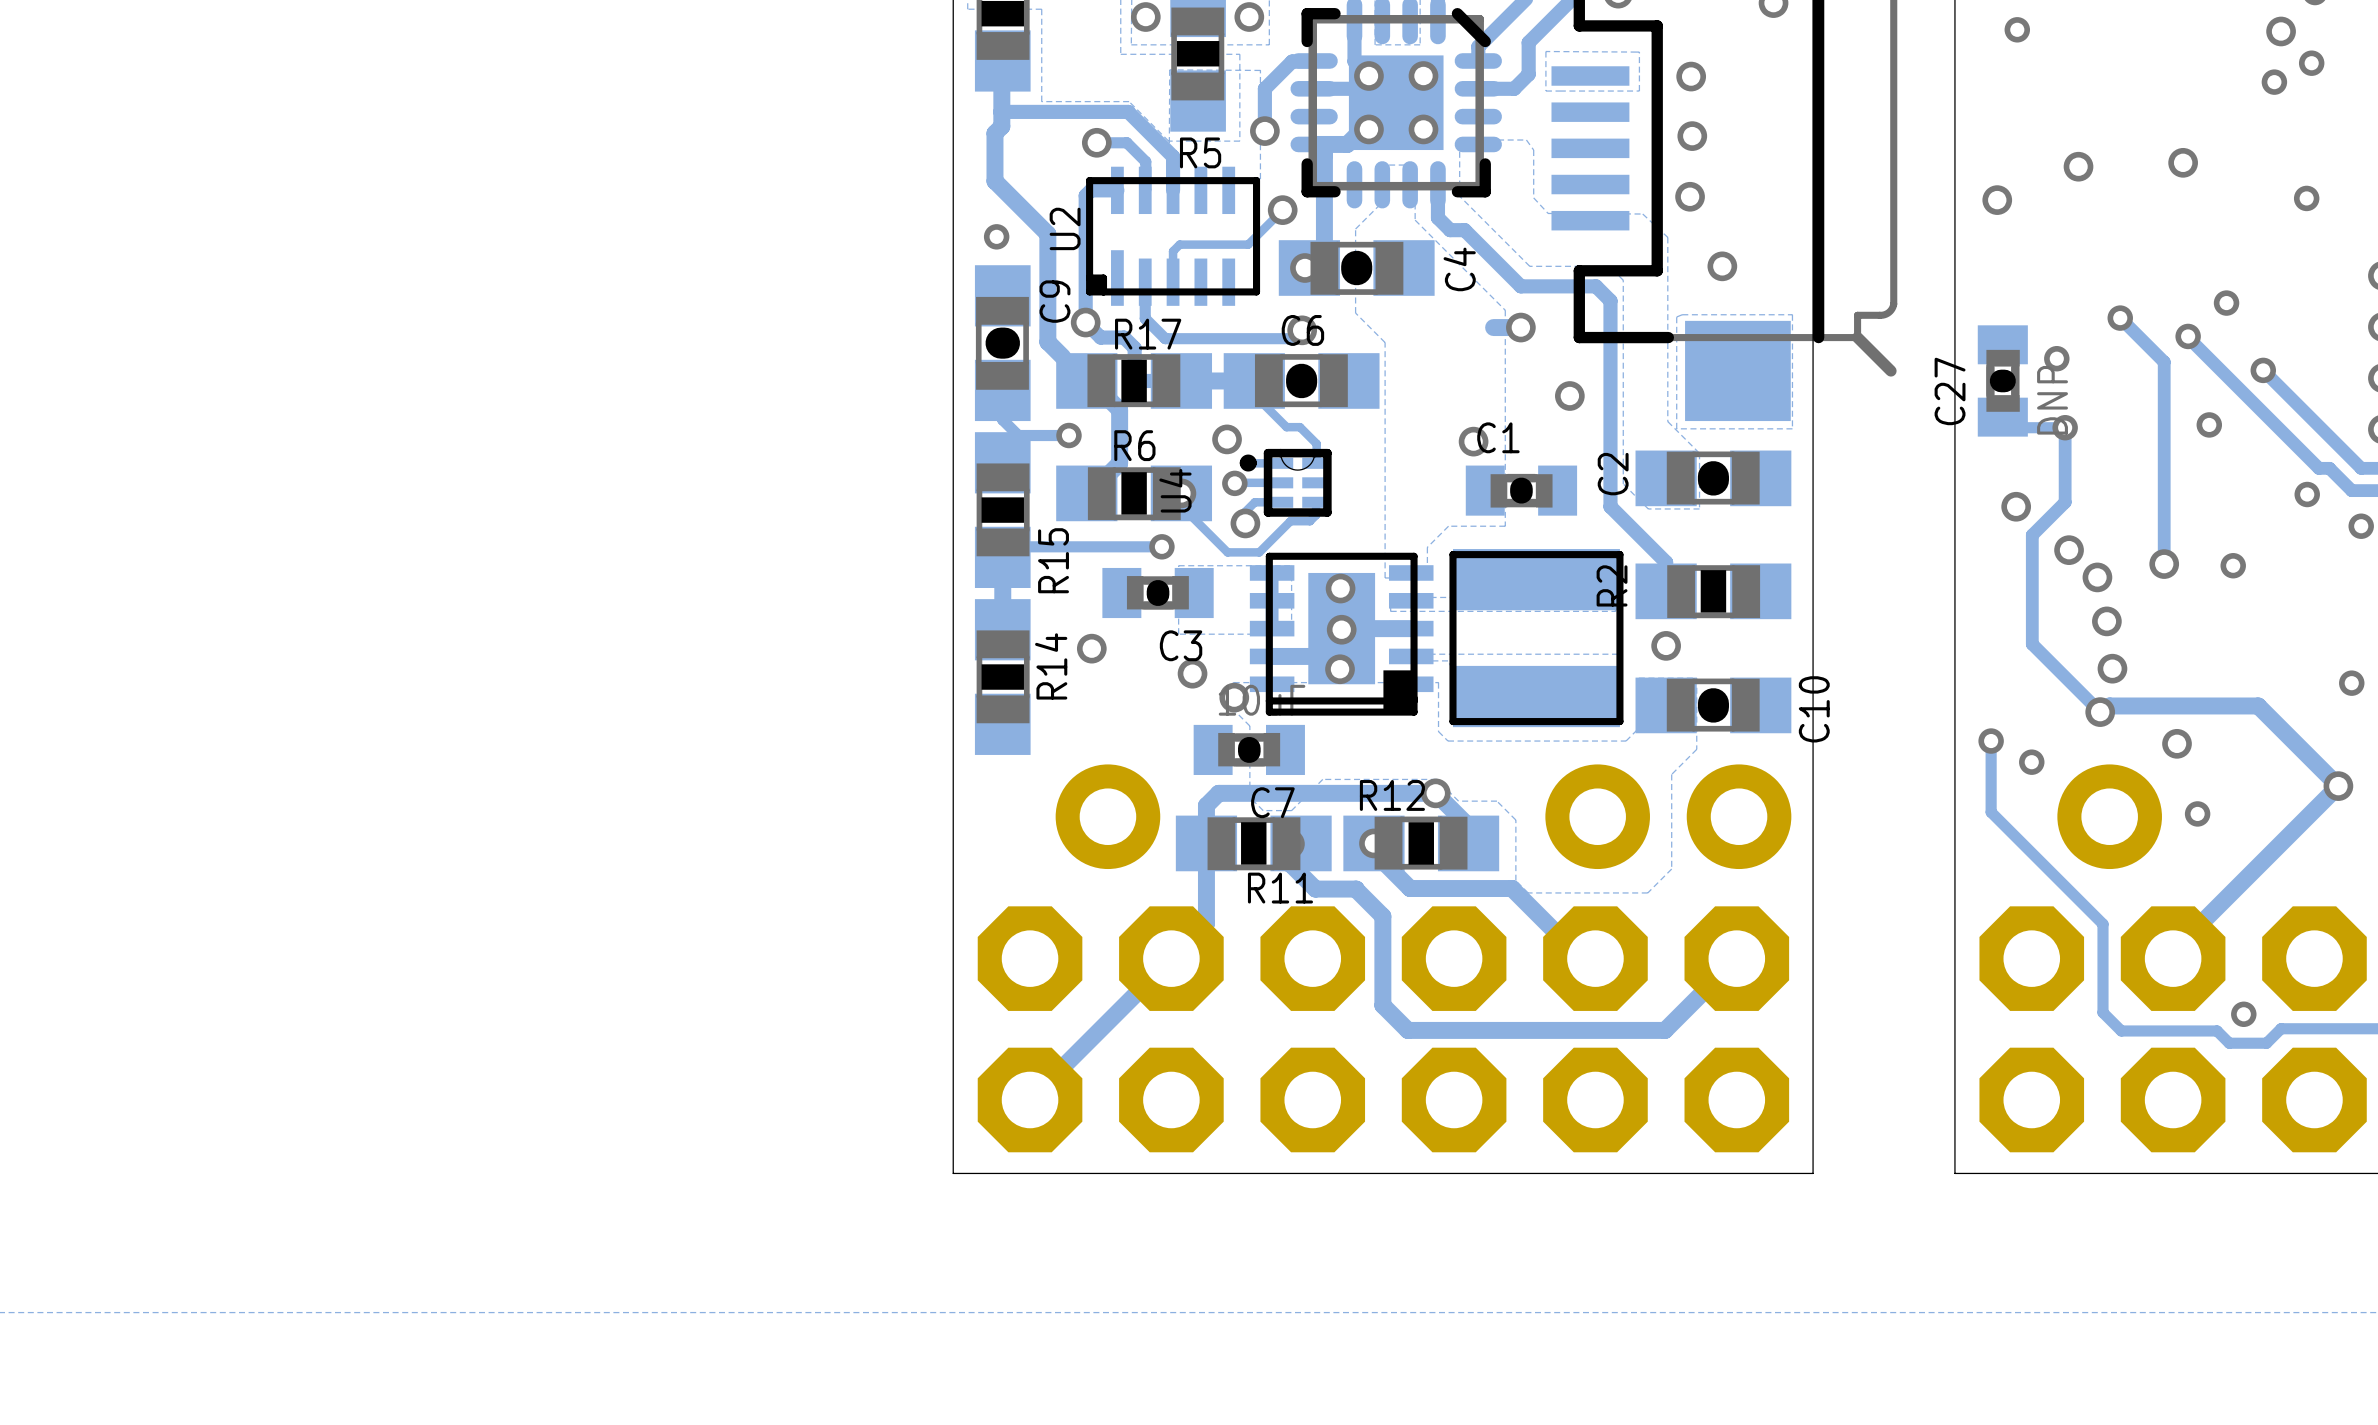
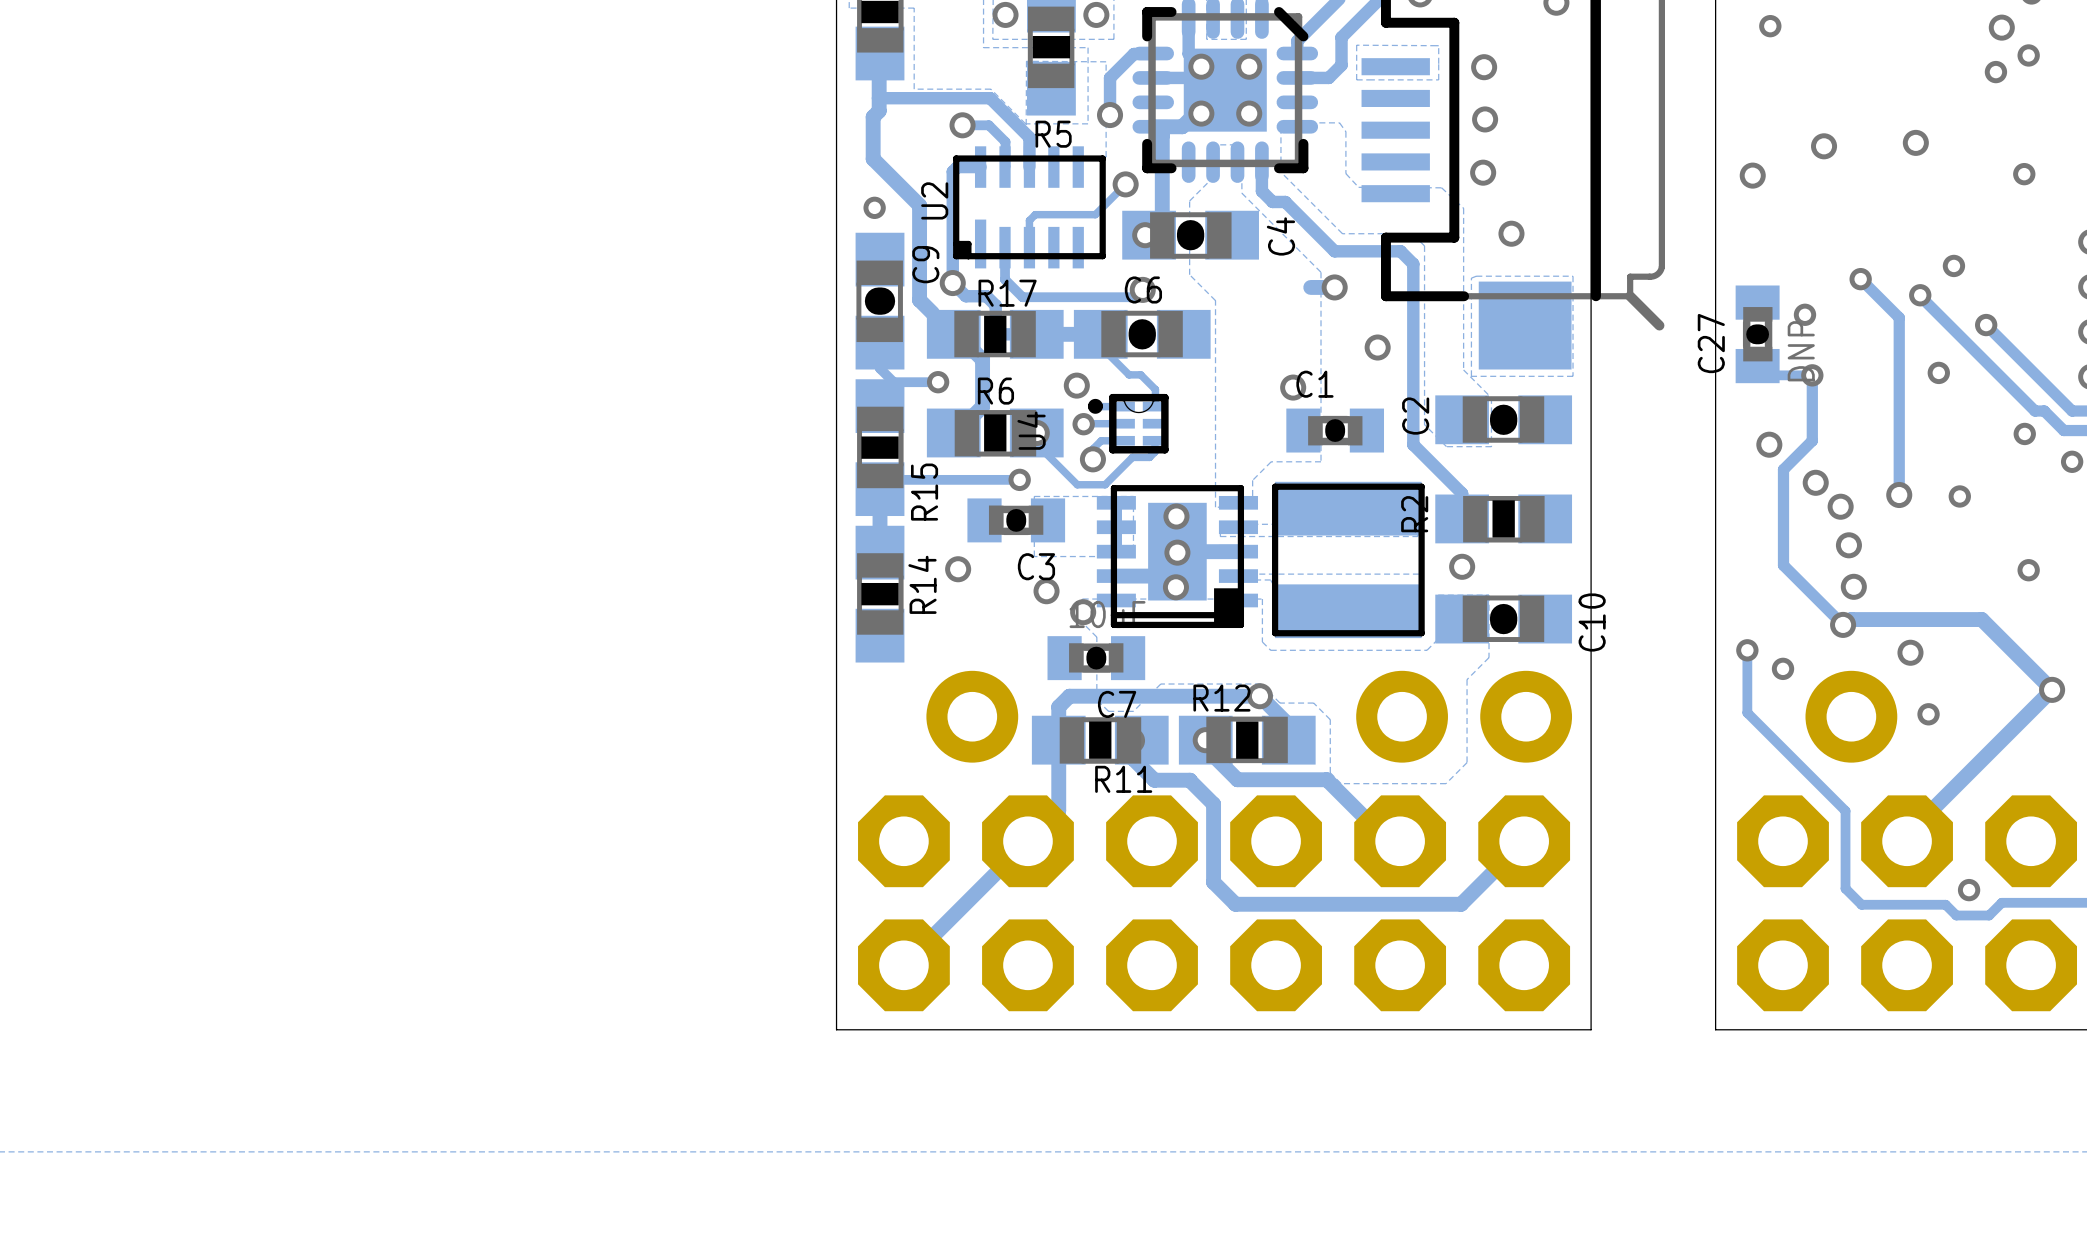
via: none -> (2028, 570)
via: (2351, 683) -> none

